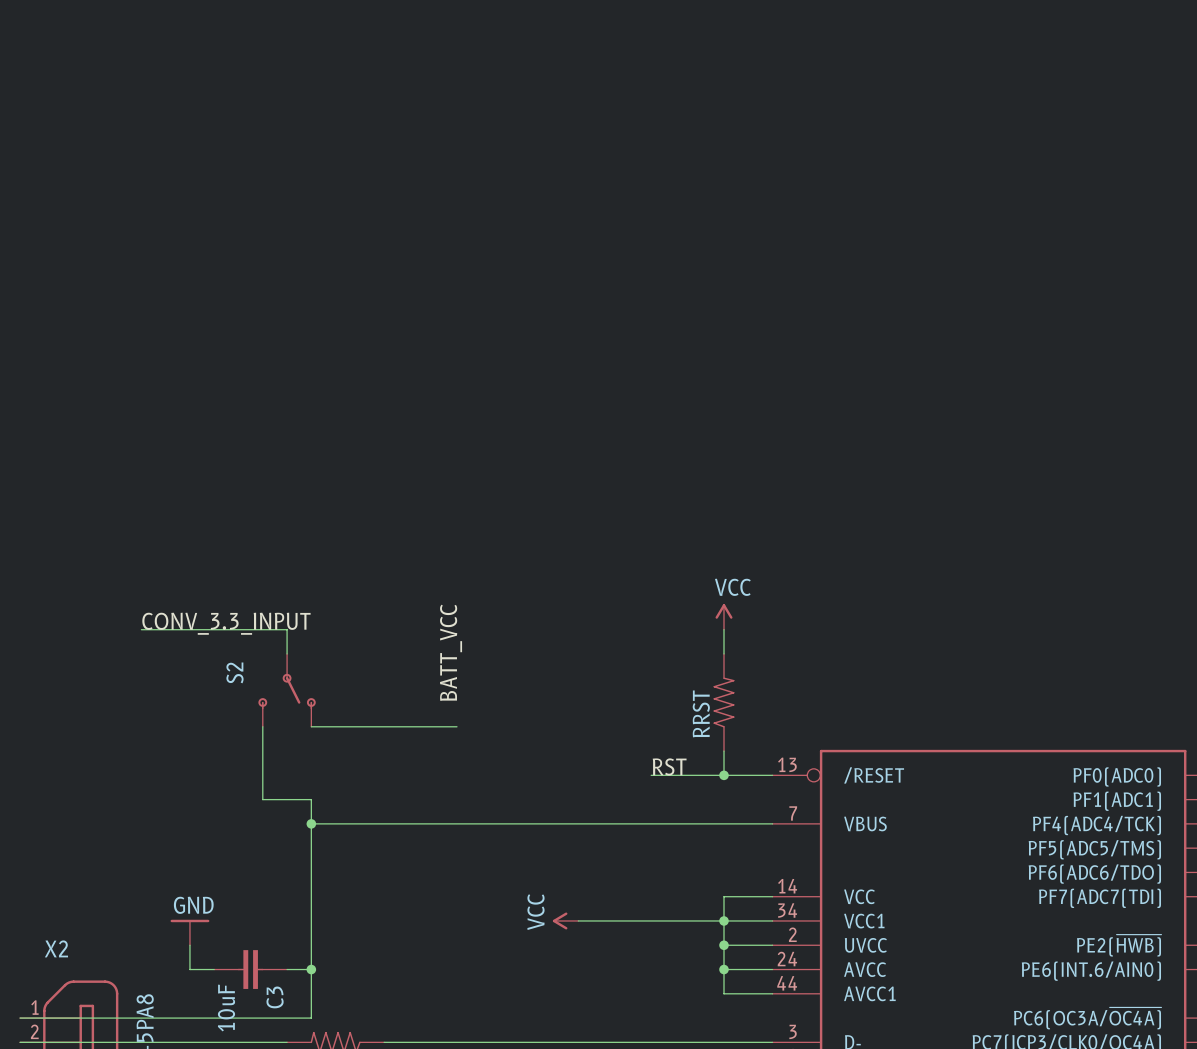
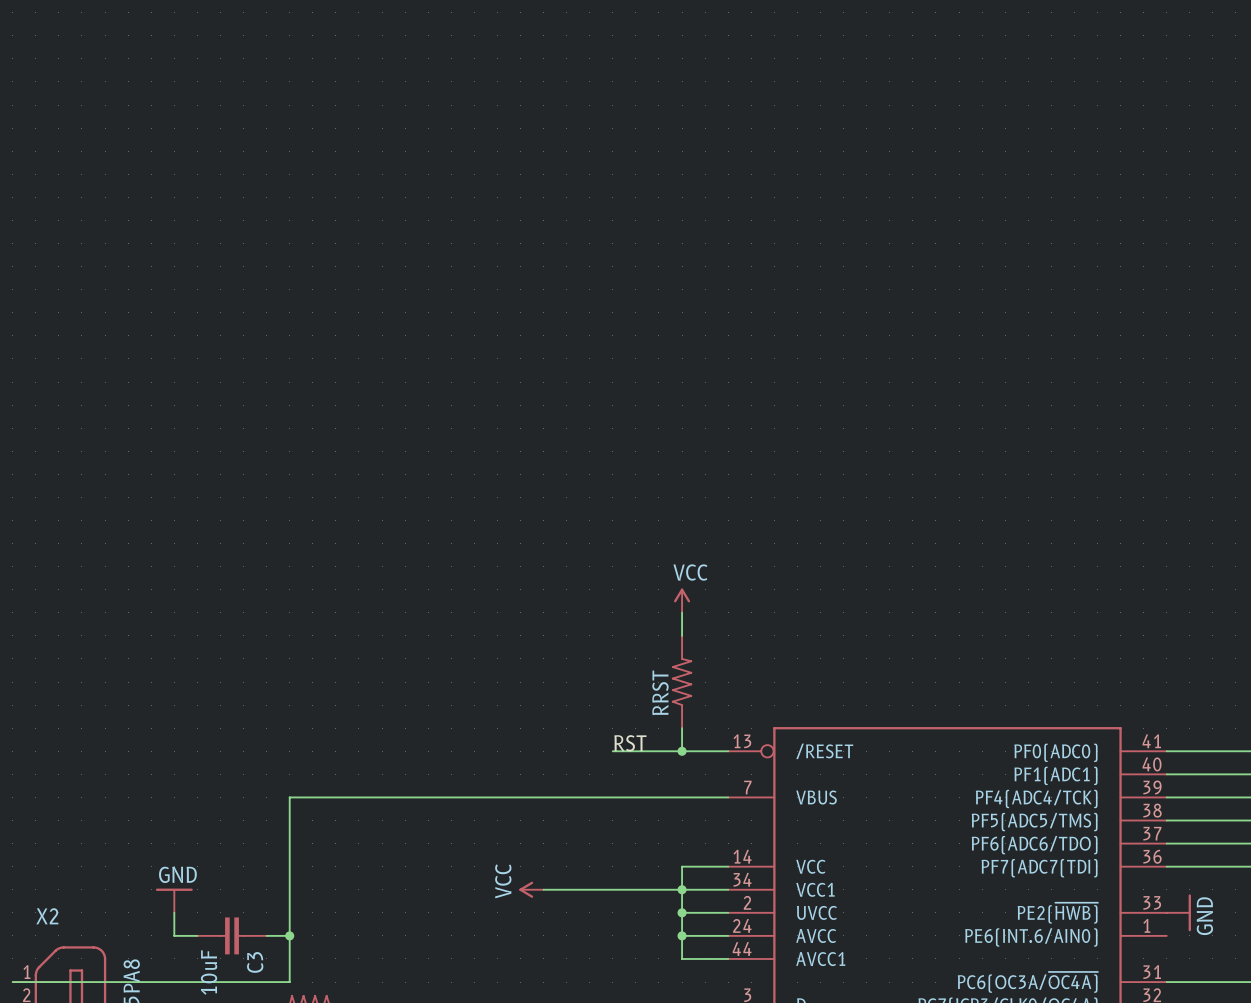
label: CONV_3.3_INPUT (226, 623) -> none
wire: (141, 629) (287, 629) (287, 653) -> none
label: BATT_VCC (451, 652) -> none
S2: (287, 690) -> none
wire: (262, 726) (262, 799) (311, 799) (311, 823) -> none
wire: (311, 726) (456, 726) -> none
junction: (311, 823) -> none

